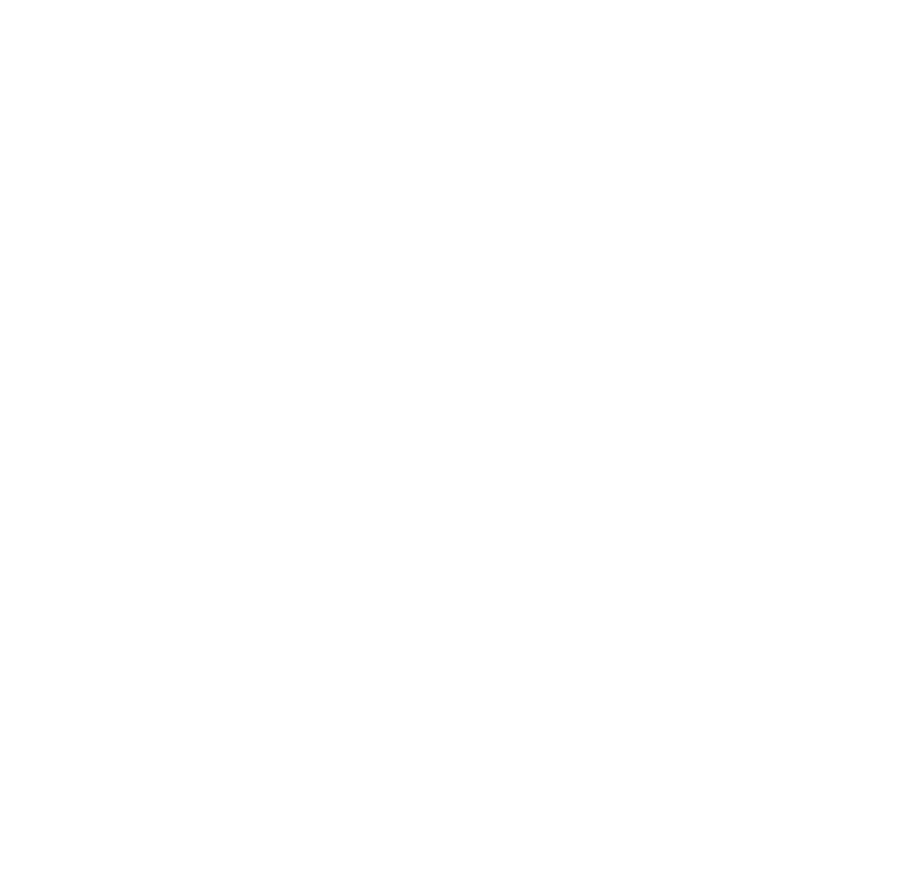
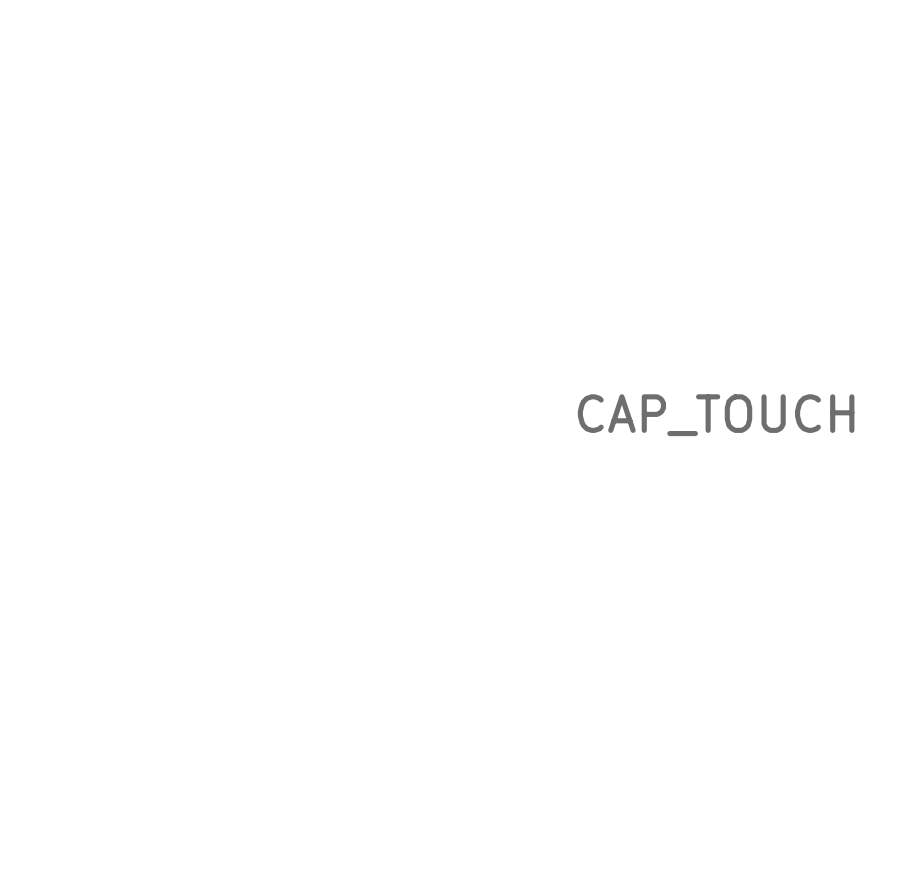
label: none -> CAP_TOUCH (716, 415)

